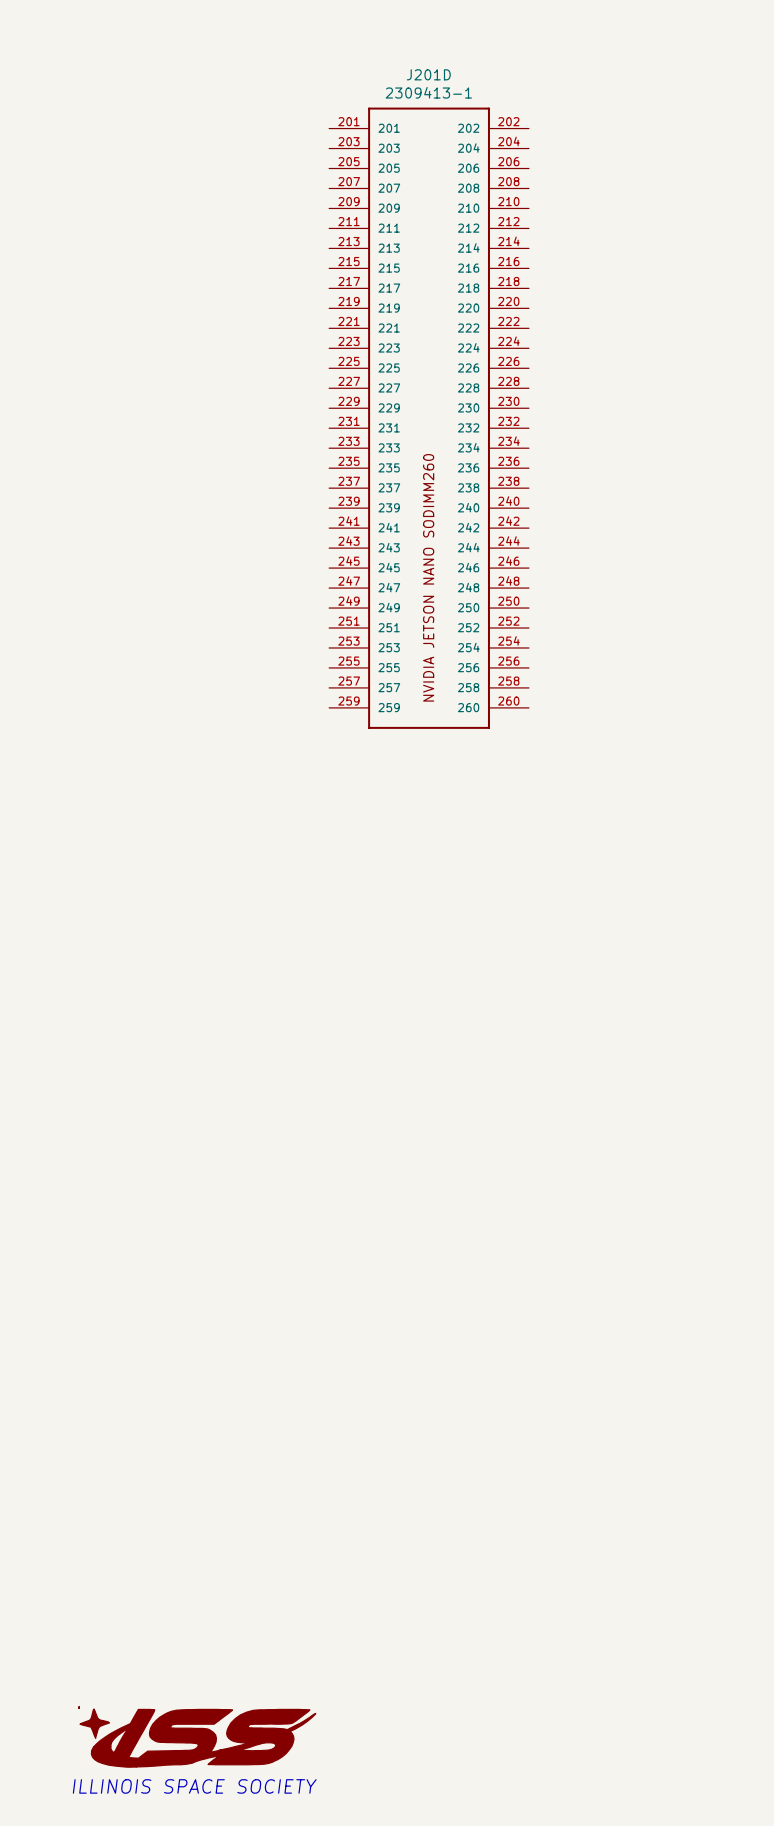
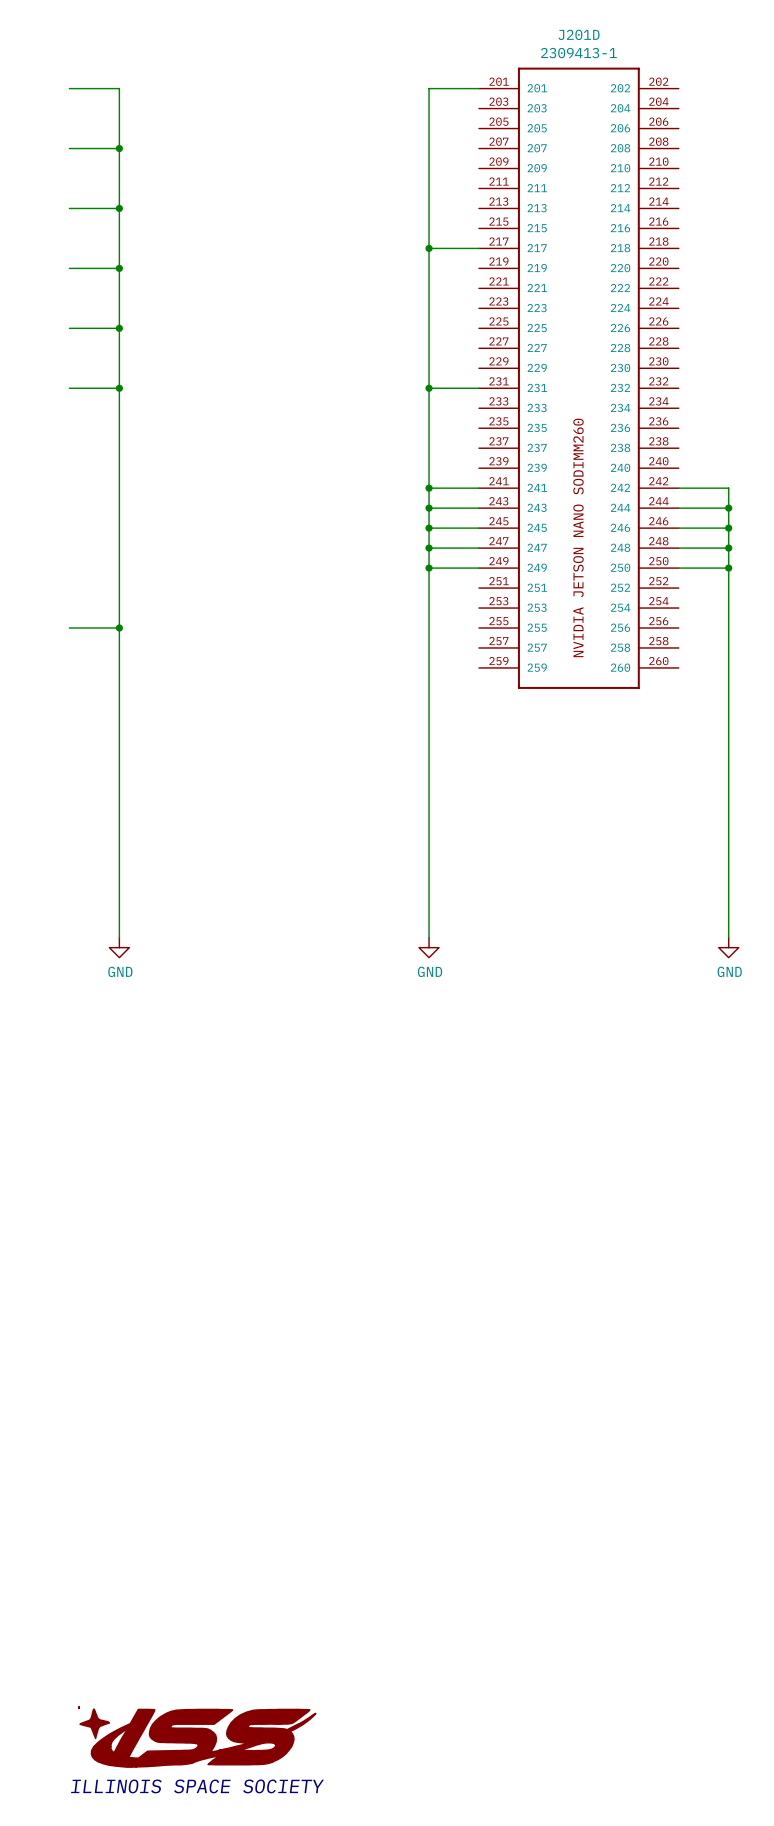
wire: none -> (69, 88) (119, 88) (119, 937)
wire: none -> (478, 88) (429, 88) (429, 937)
wire: none -> (69, 148) (119, 148)
junction: none -> (119, 148)
wire: none -> (69, 208) (119, 208)
junction: none -> (119, 208)
wire: none -> (429, 248) (478, 248)
junction: none -> (429, 248)
wire: none -> (69, 268) (119, 268)
junction: none -> (119, 268)
wire: none -> (69, 328) (119, 328)
junction: none -> (119, 328)
wire: none -> (69, 388) (119, 388)
junction: none -> (119, 388)
wire: none -> (429, 388) (478, 388)
junction: none -> (429, 388)
J201D position: (429, 418) -> (578, 378)
wire: none -> (429, 488) (478, 488)
junction: none -> (429, 488)
wire: none -> (678, 488) (728, 488) (728, 937)
wire: none -> (429, 508) (478, 508)
junction: none -> (429, 508)
wire: none -> (678, 508) (728, 508)
junction: none -> (728, 508)
wire: none -> (429, 528) (478, 528)
junction: none -> (429, 528)
wire: none -> (678, 528) (728, 528)
junction: none -> (728, 528)
wire: none -> (429, 548) (478, 548)
junction: none -> (429, 548)
wire: none -> (678, 548) (728, 548)
junction: none -> (728, 548)
wire: none -> (429, 568) (478, 568)
junction: none -> (429, 568)
wire: none -> (678, 568) (728, 568)
junction: none -> (728, 568)
wire: none -> (69, 628) (119, 628)
junction: none -> (119, 628)
power symbol: none -> GND (119, 947)
power symbol: none -> GND (429, 947)
power symbol: none -> GND (728, 947)

